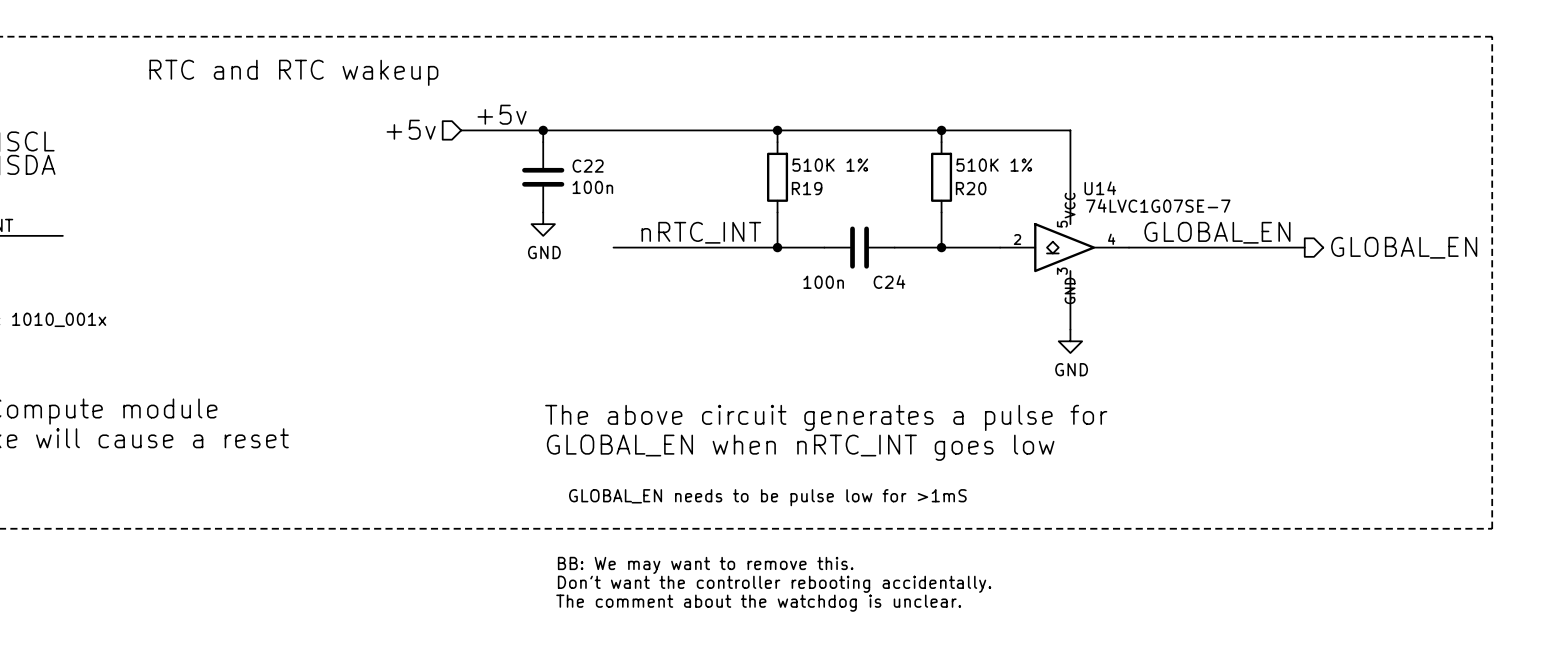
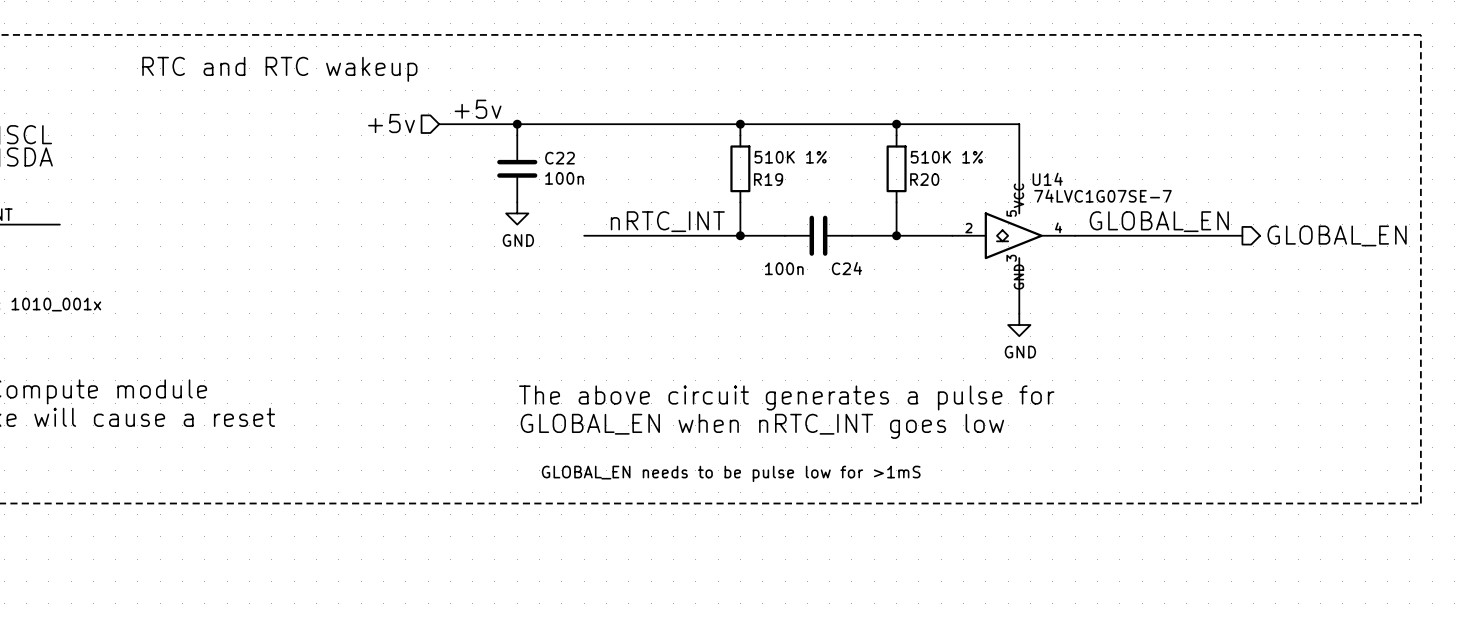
text: BB: We may want to remove this. (705, 565) -> none
text: Don't want the controller rebooting accidentally. (774, 584) -> none
text: The comment about the watchdog is unclear. (758, 603) -> none

